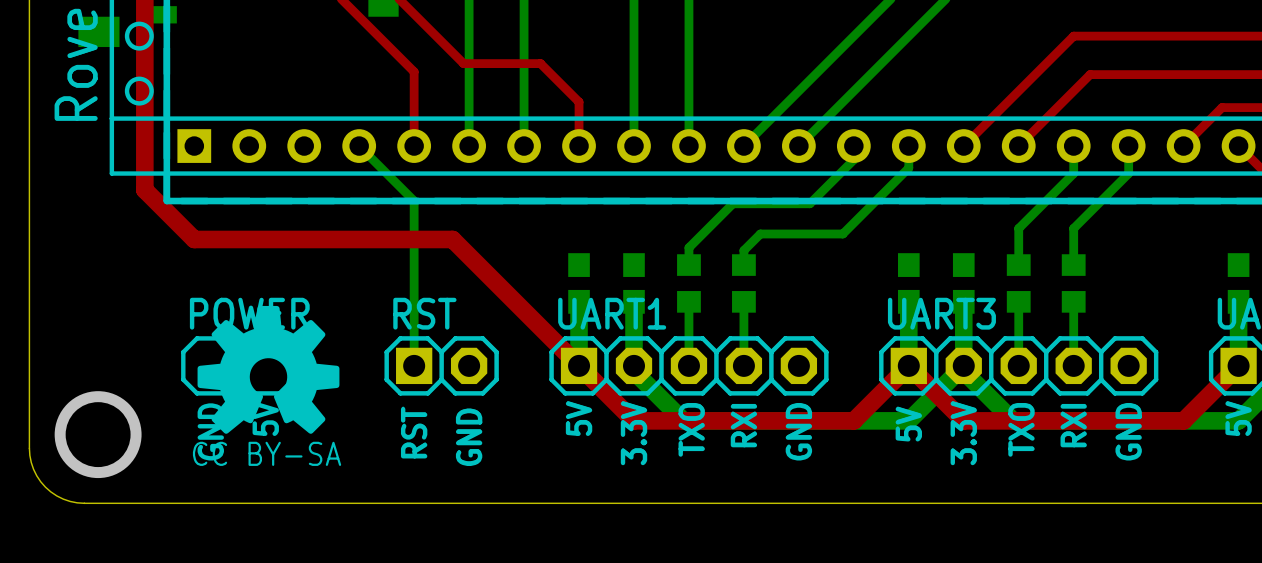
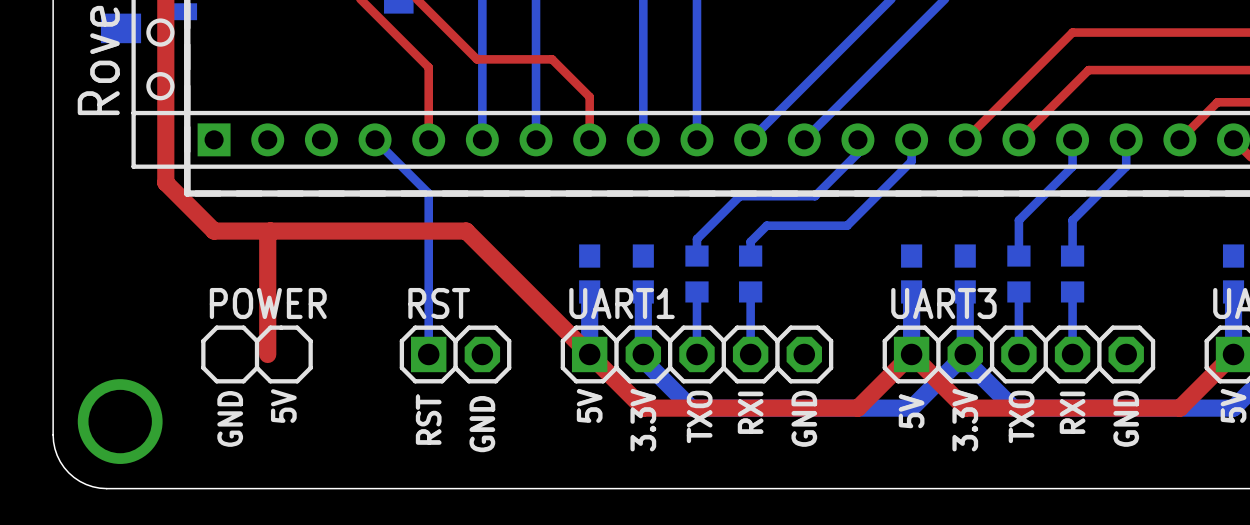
top track: none -> (270, 231) (267, 233) (267, 354)
drawing: [197, 305, 340, 434] -> none
text: CC BY-SA (267, 453) -> none

